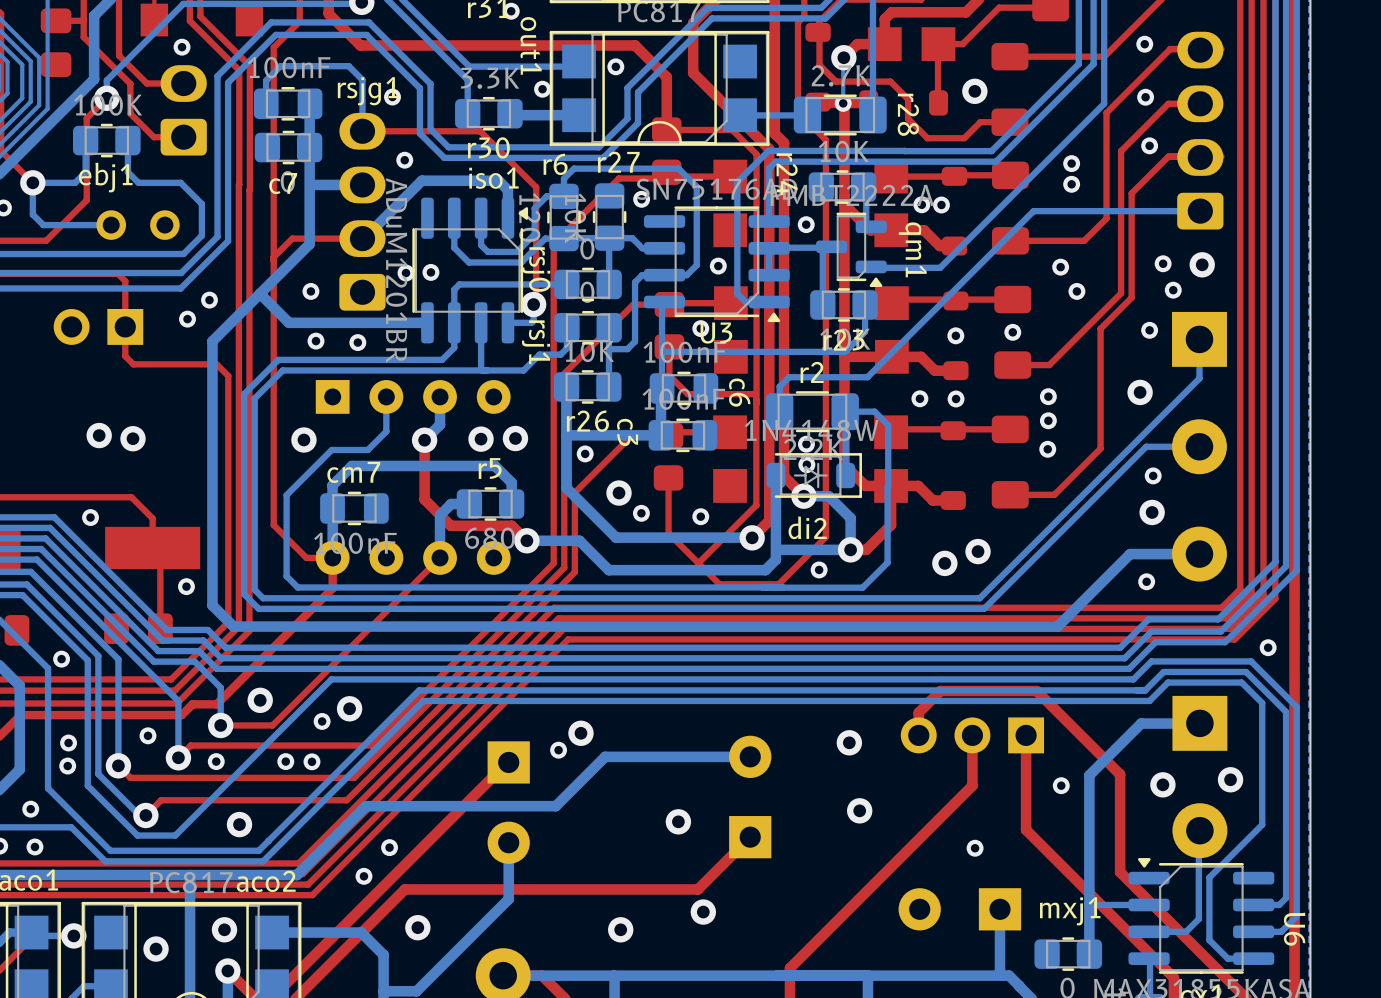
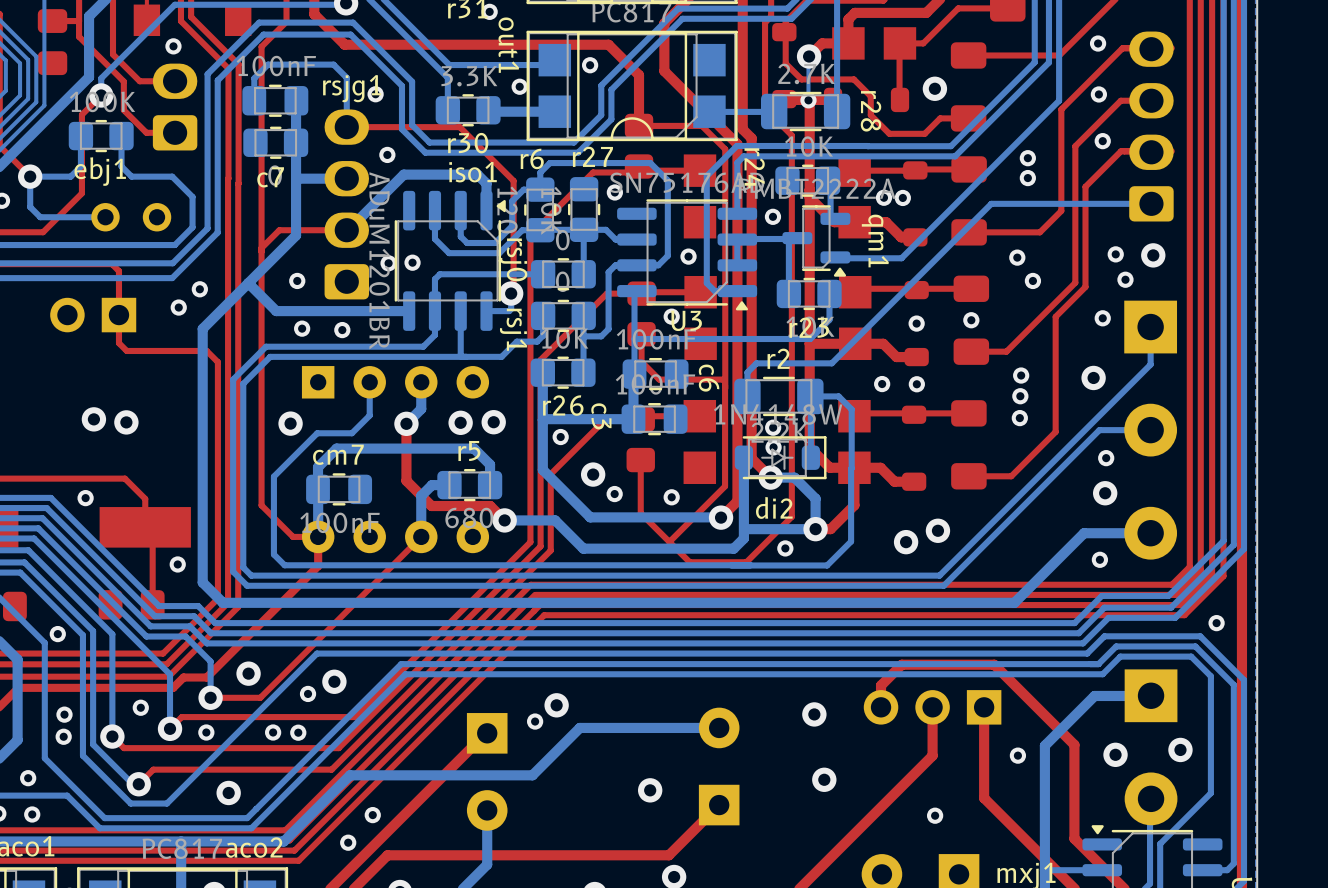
via: none -> (1021, 375)
via: (1048, 396) -> none
via: none -> (1020, 396)
via: (1048, 420) -> none
via: none -> (1019, 418)
via: (1047, 449) -> none

